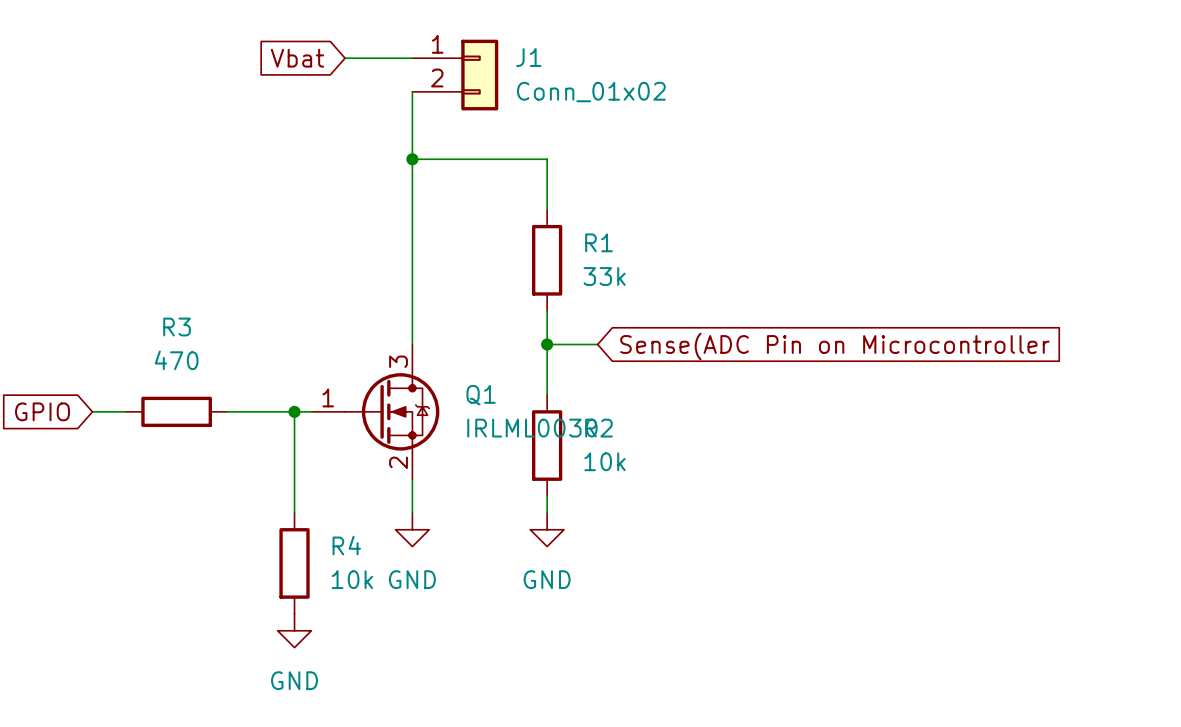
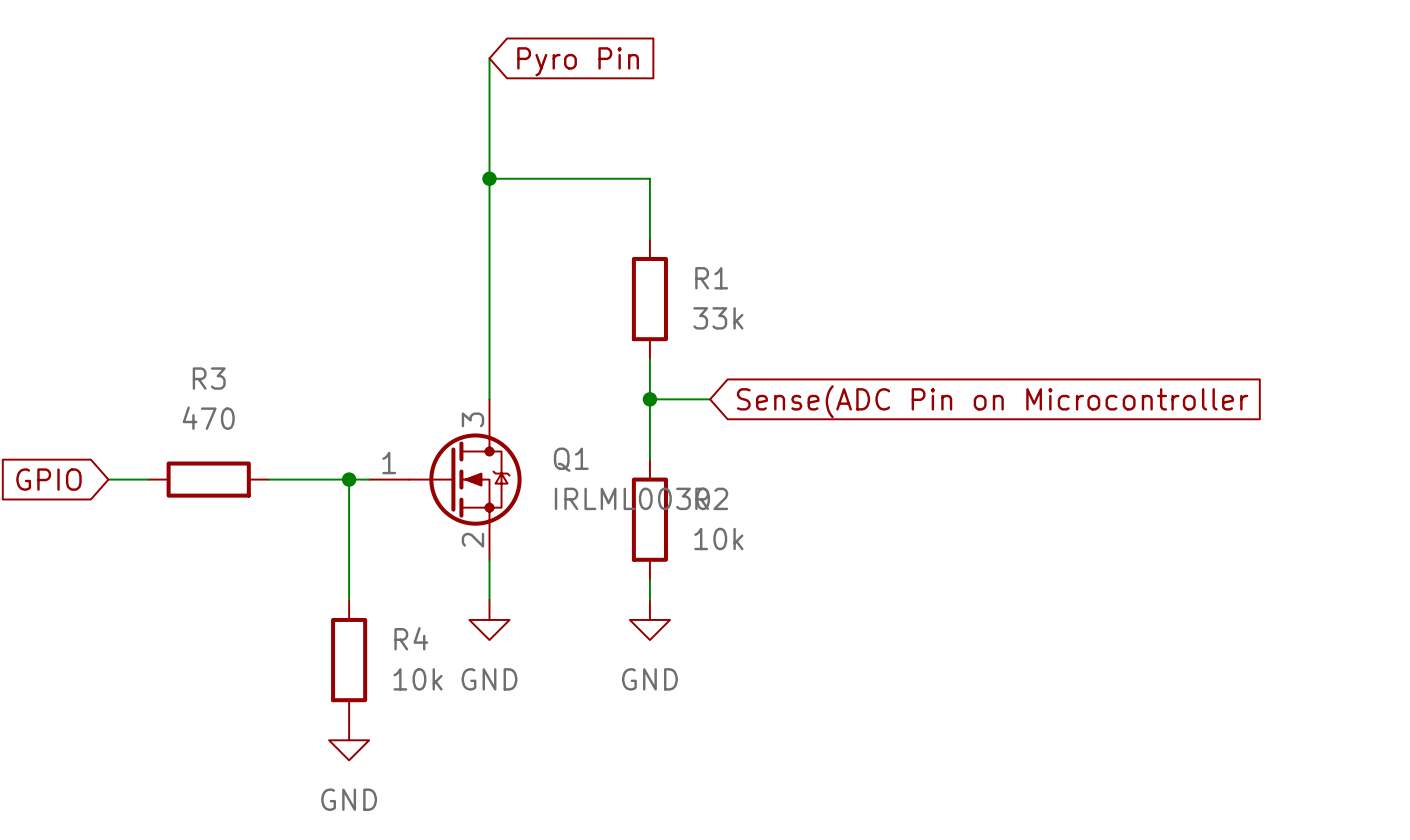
global label: Vbat (297, 58) -> none
wire: (345, 58) (412, 58) -> (489, 98) (489, 58)
global label: none -> Pyro Pin (578, 61)
J1: Conn_01x02 (455, 75) -> none

